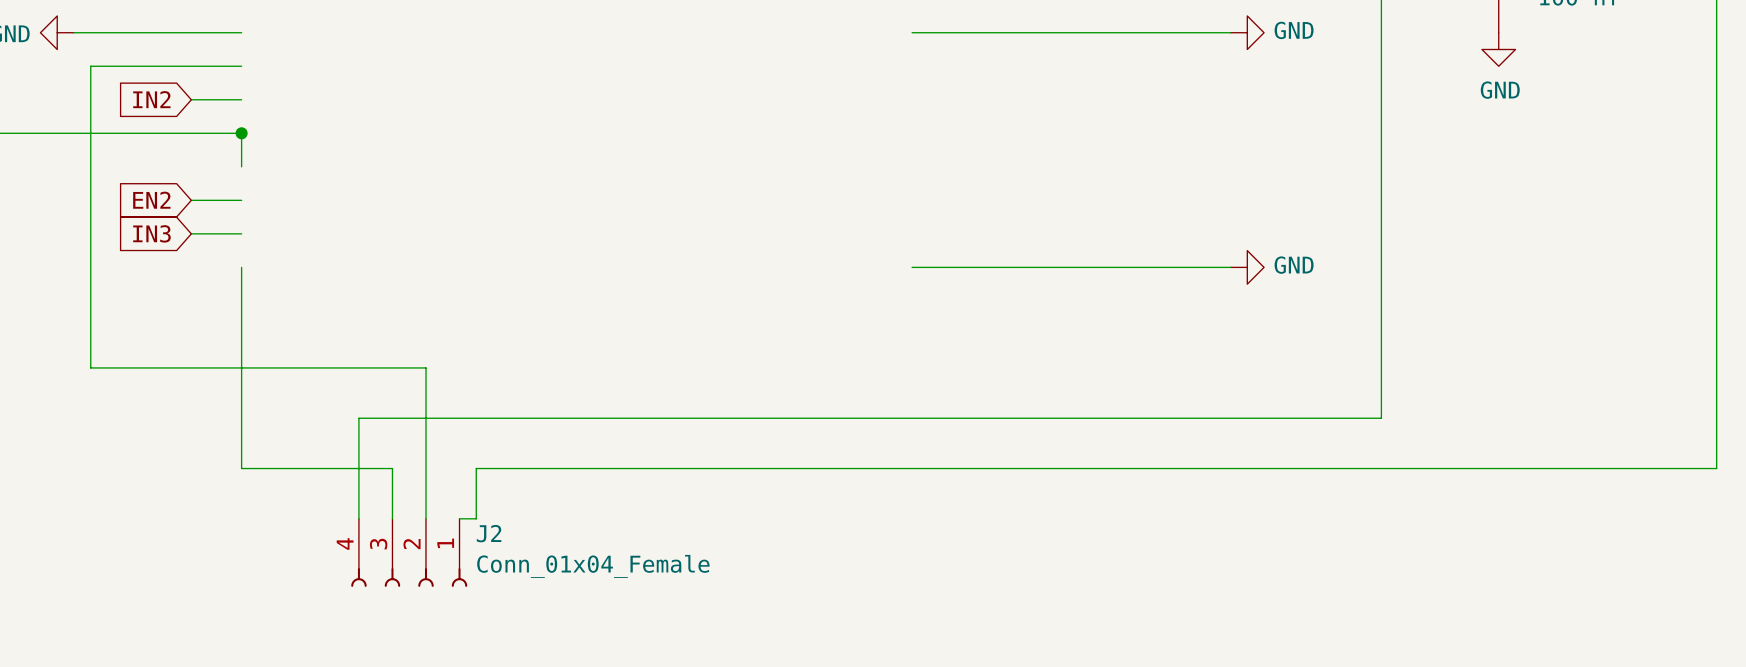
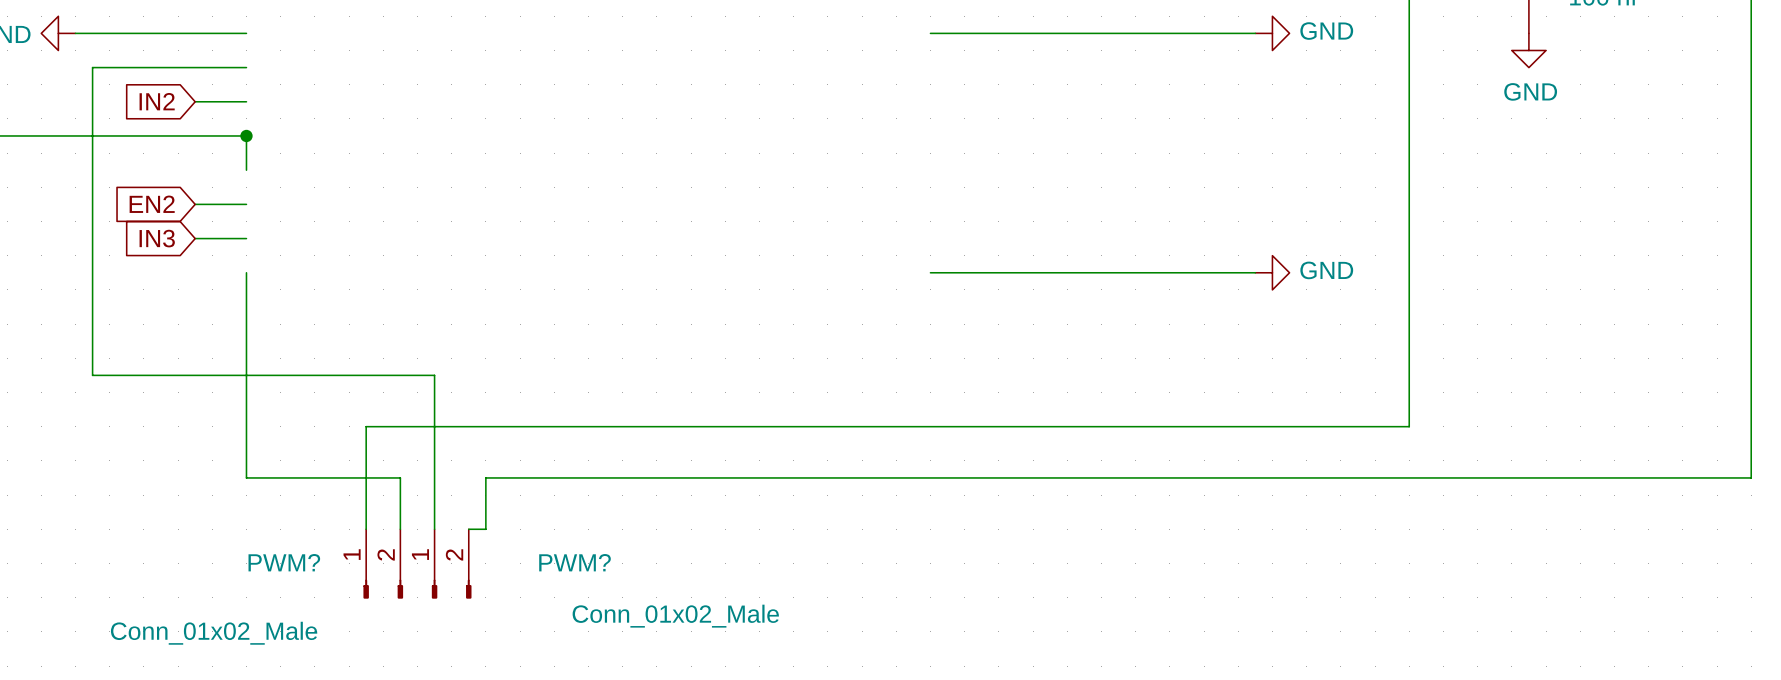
PWM?: none -> Conn_01x02_Male (383, 563)
J2: Conn_01x04_Female (409, 552) -> none
PWM?: none -> Conn_01x02_Male (451, 563)

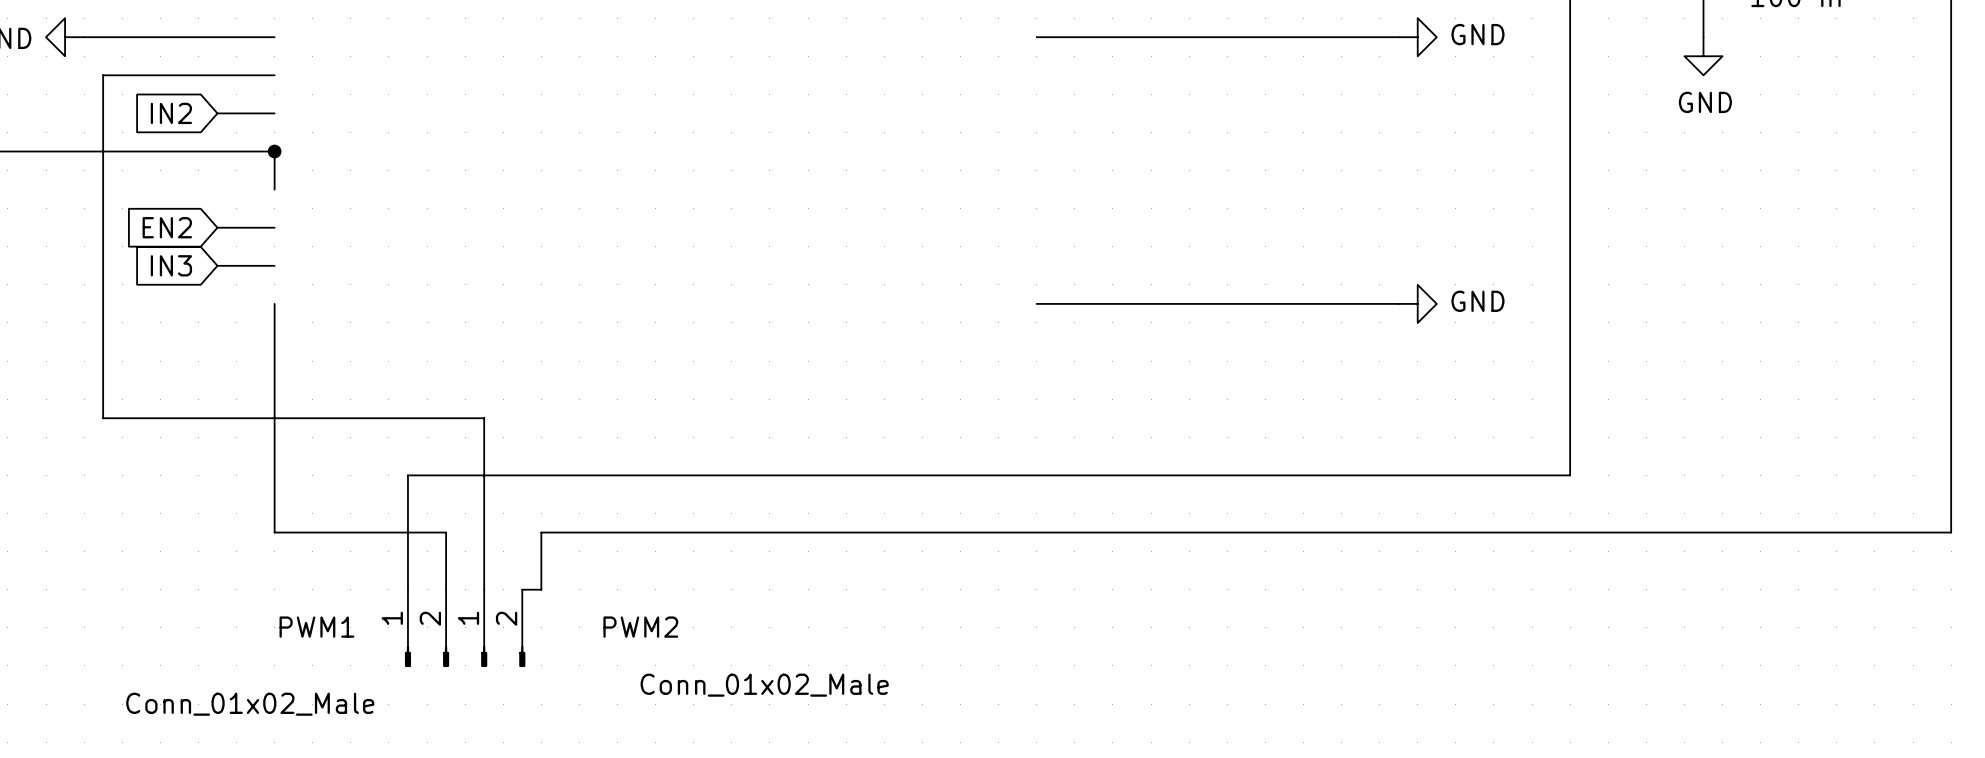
PWM? name: PWM? (284, 562) -> PWM1 (316, 627)
PWM? name: PWM? (575, 562) -> PWM2 (640, 627)

